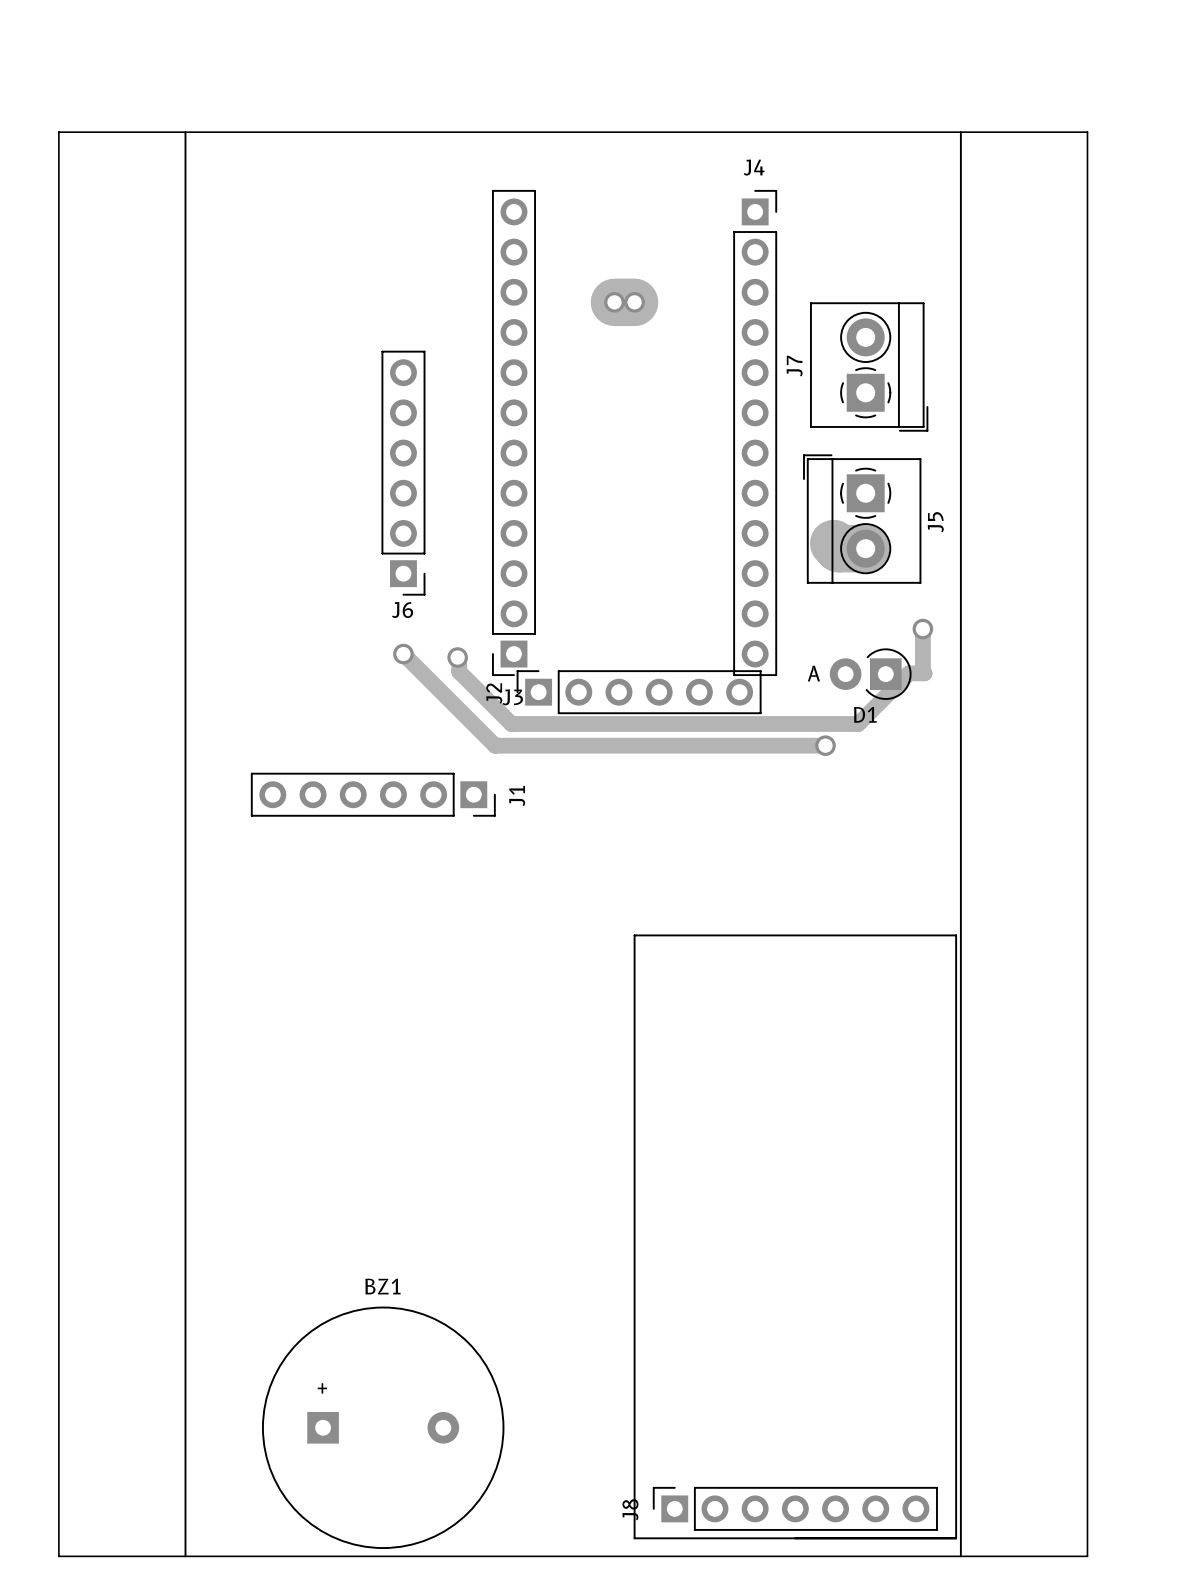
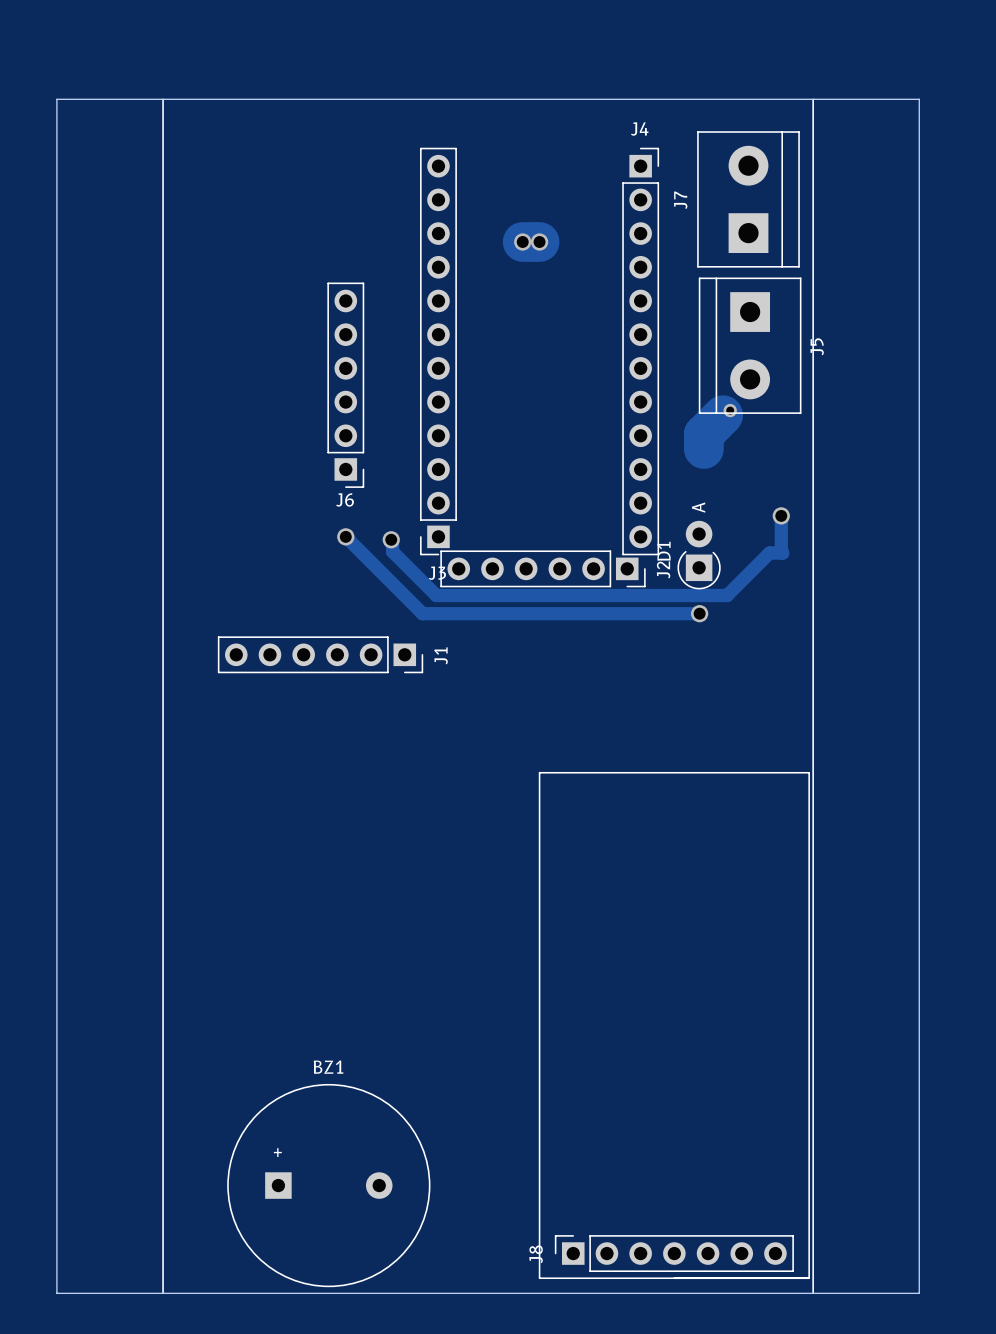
J7 footprint: [809, 302, 929, 432] -> [697, 131, 800, 268]
J5 footprint: [803, 454, 922, 584] -> [698, 277, 802, 414]
via: none -> (730, 410)
track: none -> (723, 415) (703, 434) (703, 448)
track: (833, 543) (838, 548) (865, 548) -> none
D1 rotation: 0° (870, 674) -> 90° clockwise (699, 555)
J2 rotation: 0° (639, 692) -> 180° (543, 568)

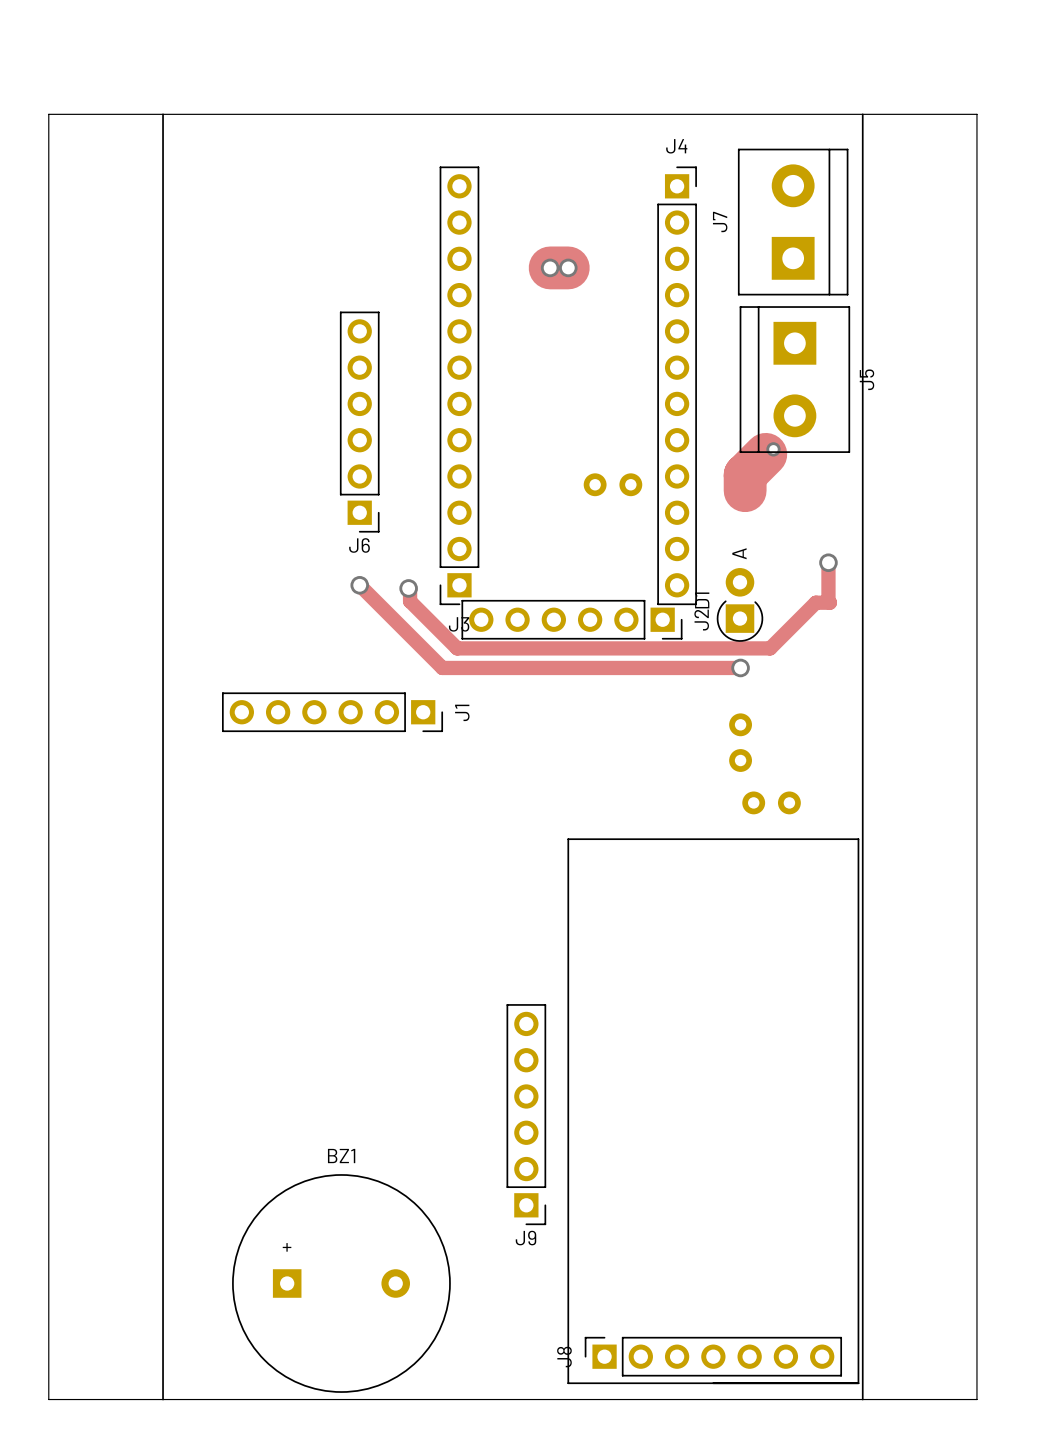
part: none -> (612, 484)
part: none -> (740, 742)
part: none -> (771, 802)
J9: none -> (526, 1114)

